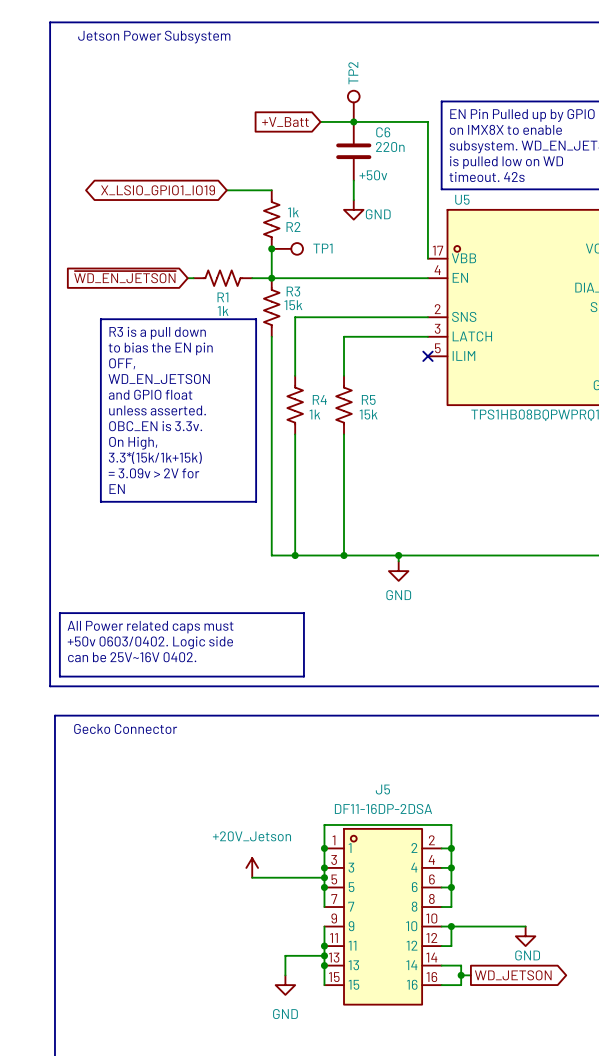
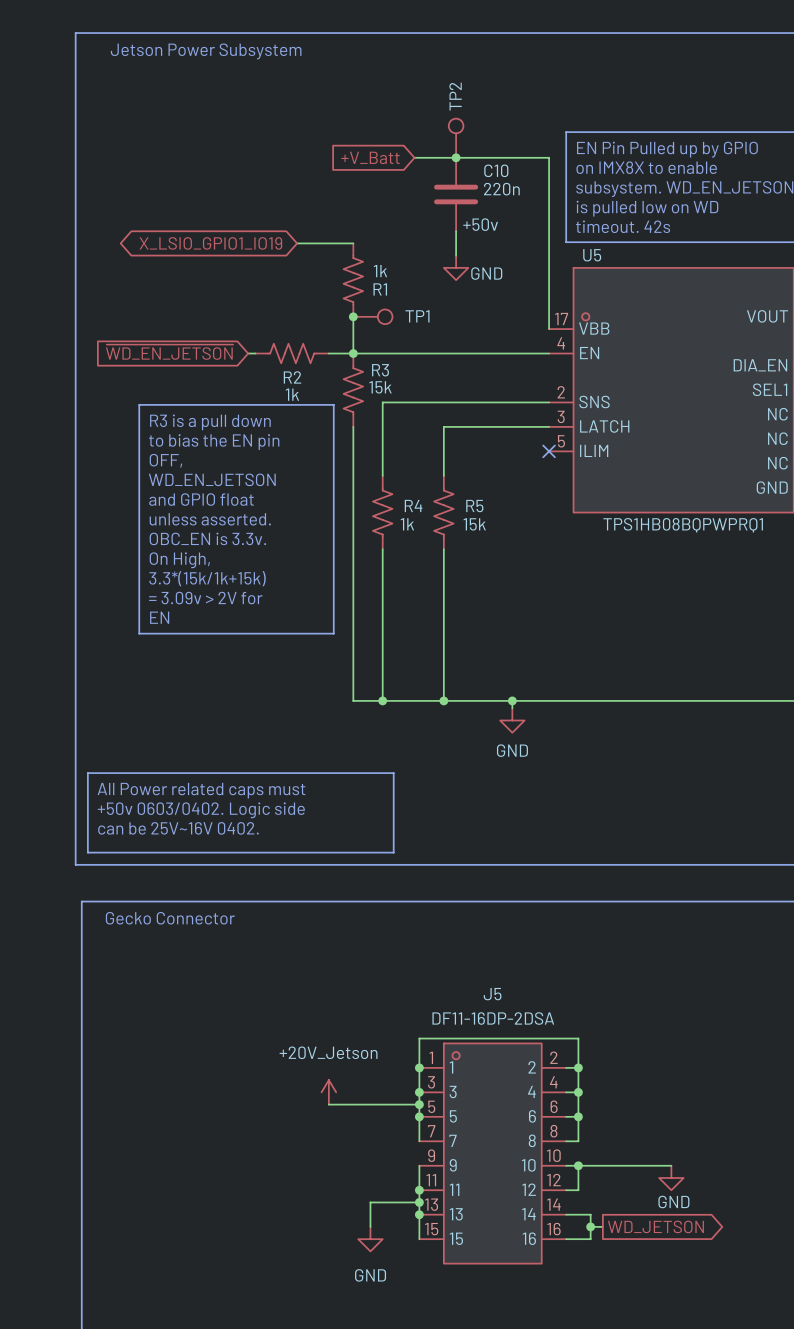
C6 name: C6 (383, 132) -> C10 (496, 170)
R2 name: R2 (293, 227) -> R1 (380, 289)
R1 name: R1 (222, 297) -> R2 (292, 377)

